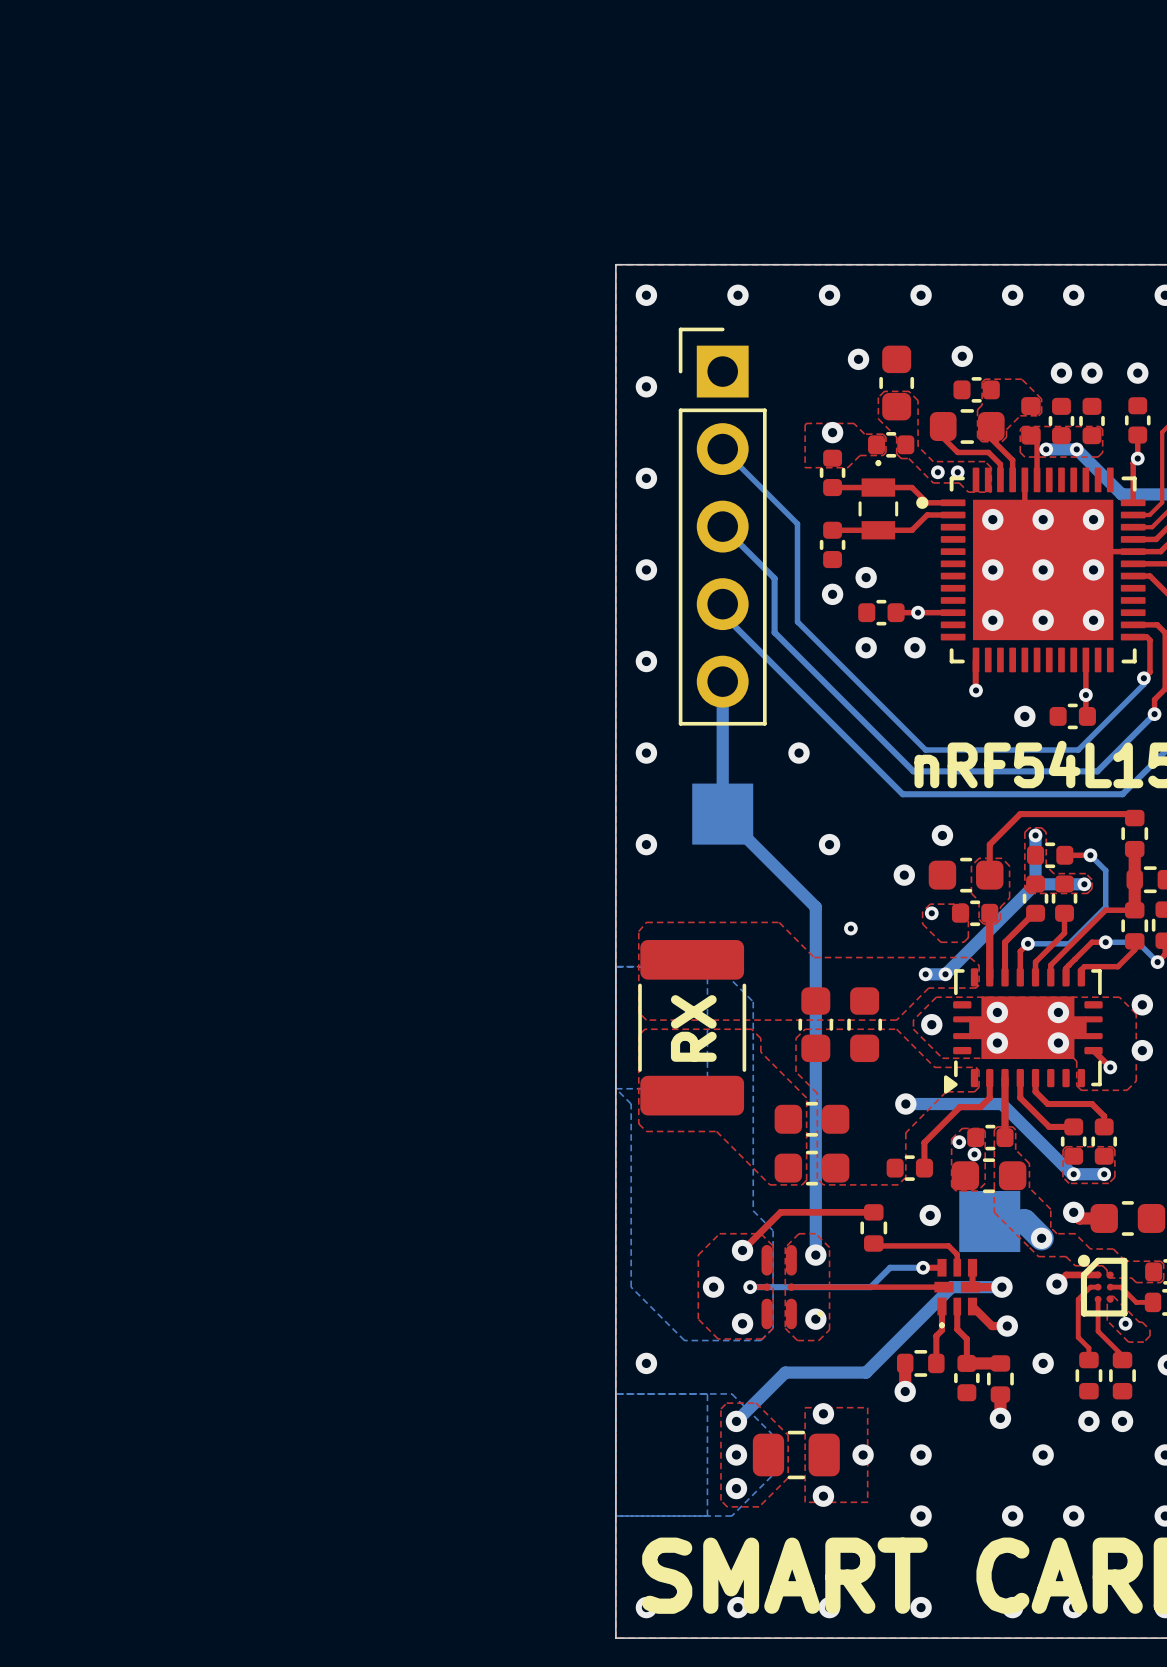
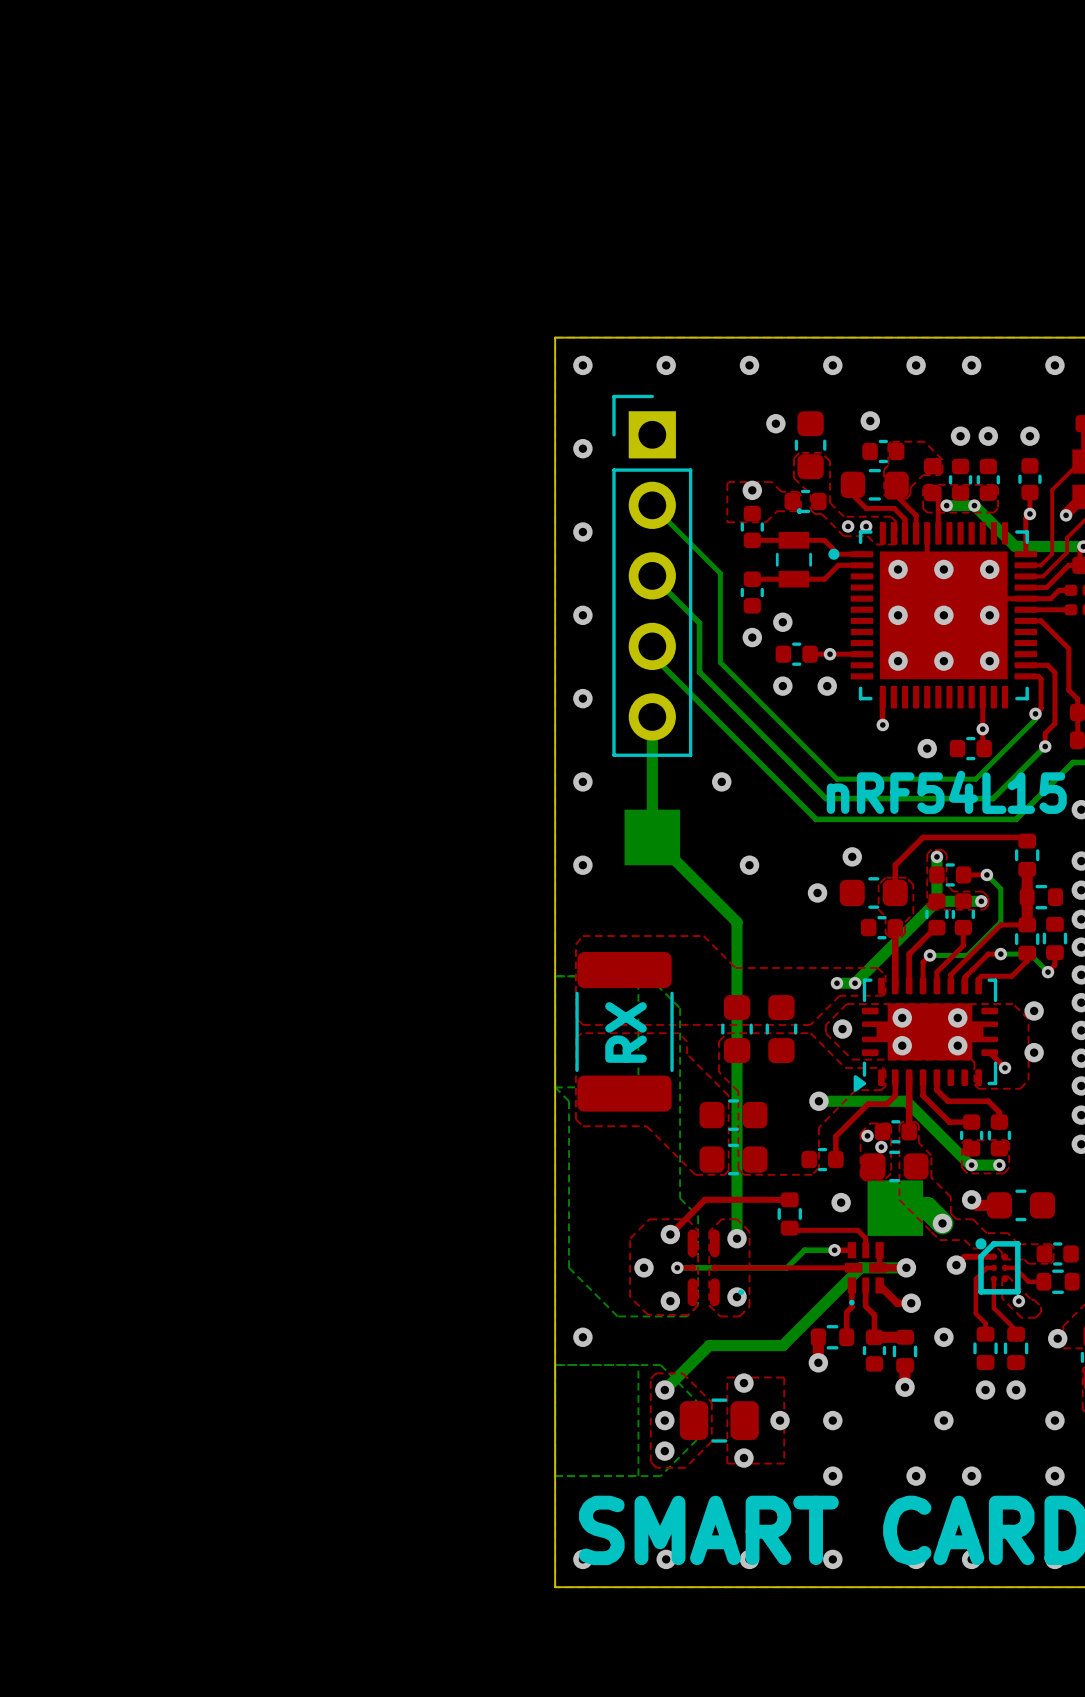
part footprint: [858, 460, 899, 540] -> [775, 508, 812, 588]
top zone outline: (930, 904) (965, 904) (968, 907) (968, 937) (963, 942) (940, 942) (922, 923) (922, 911) (930, 904) -> none
via: (931, 913) -> none
via: (850, 928) -> none

